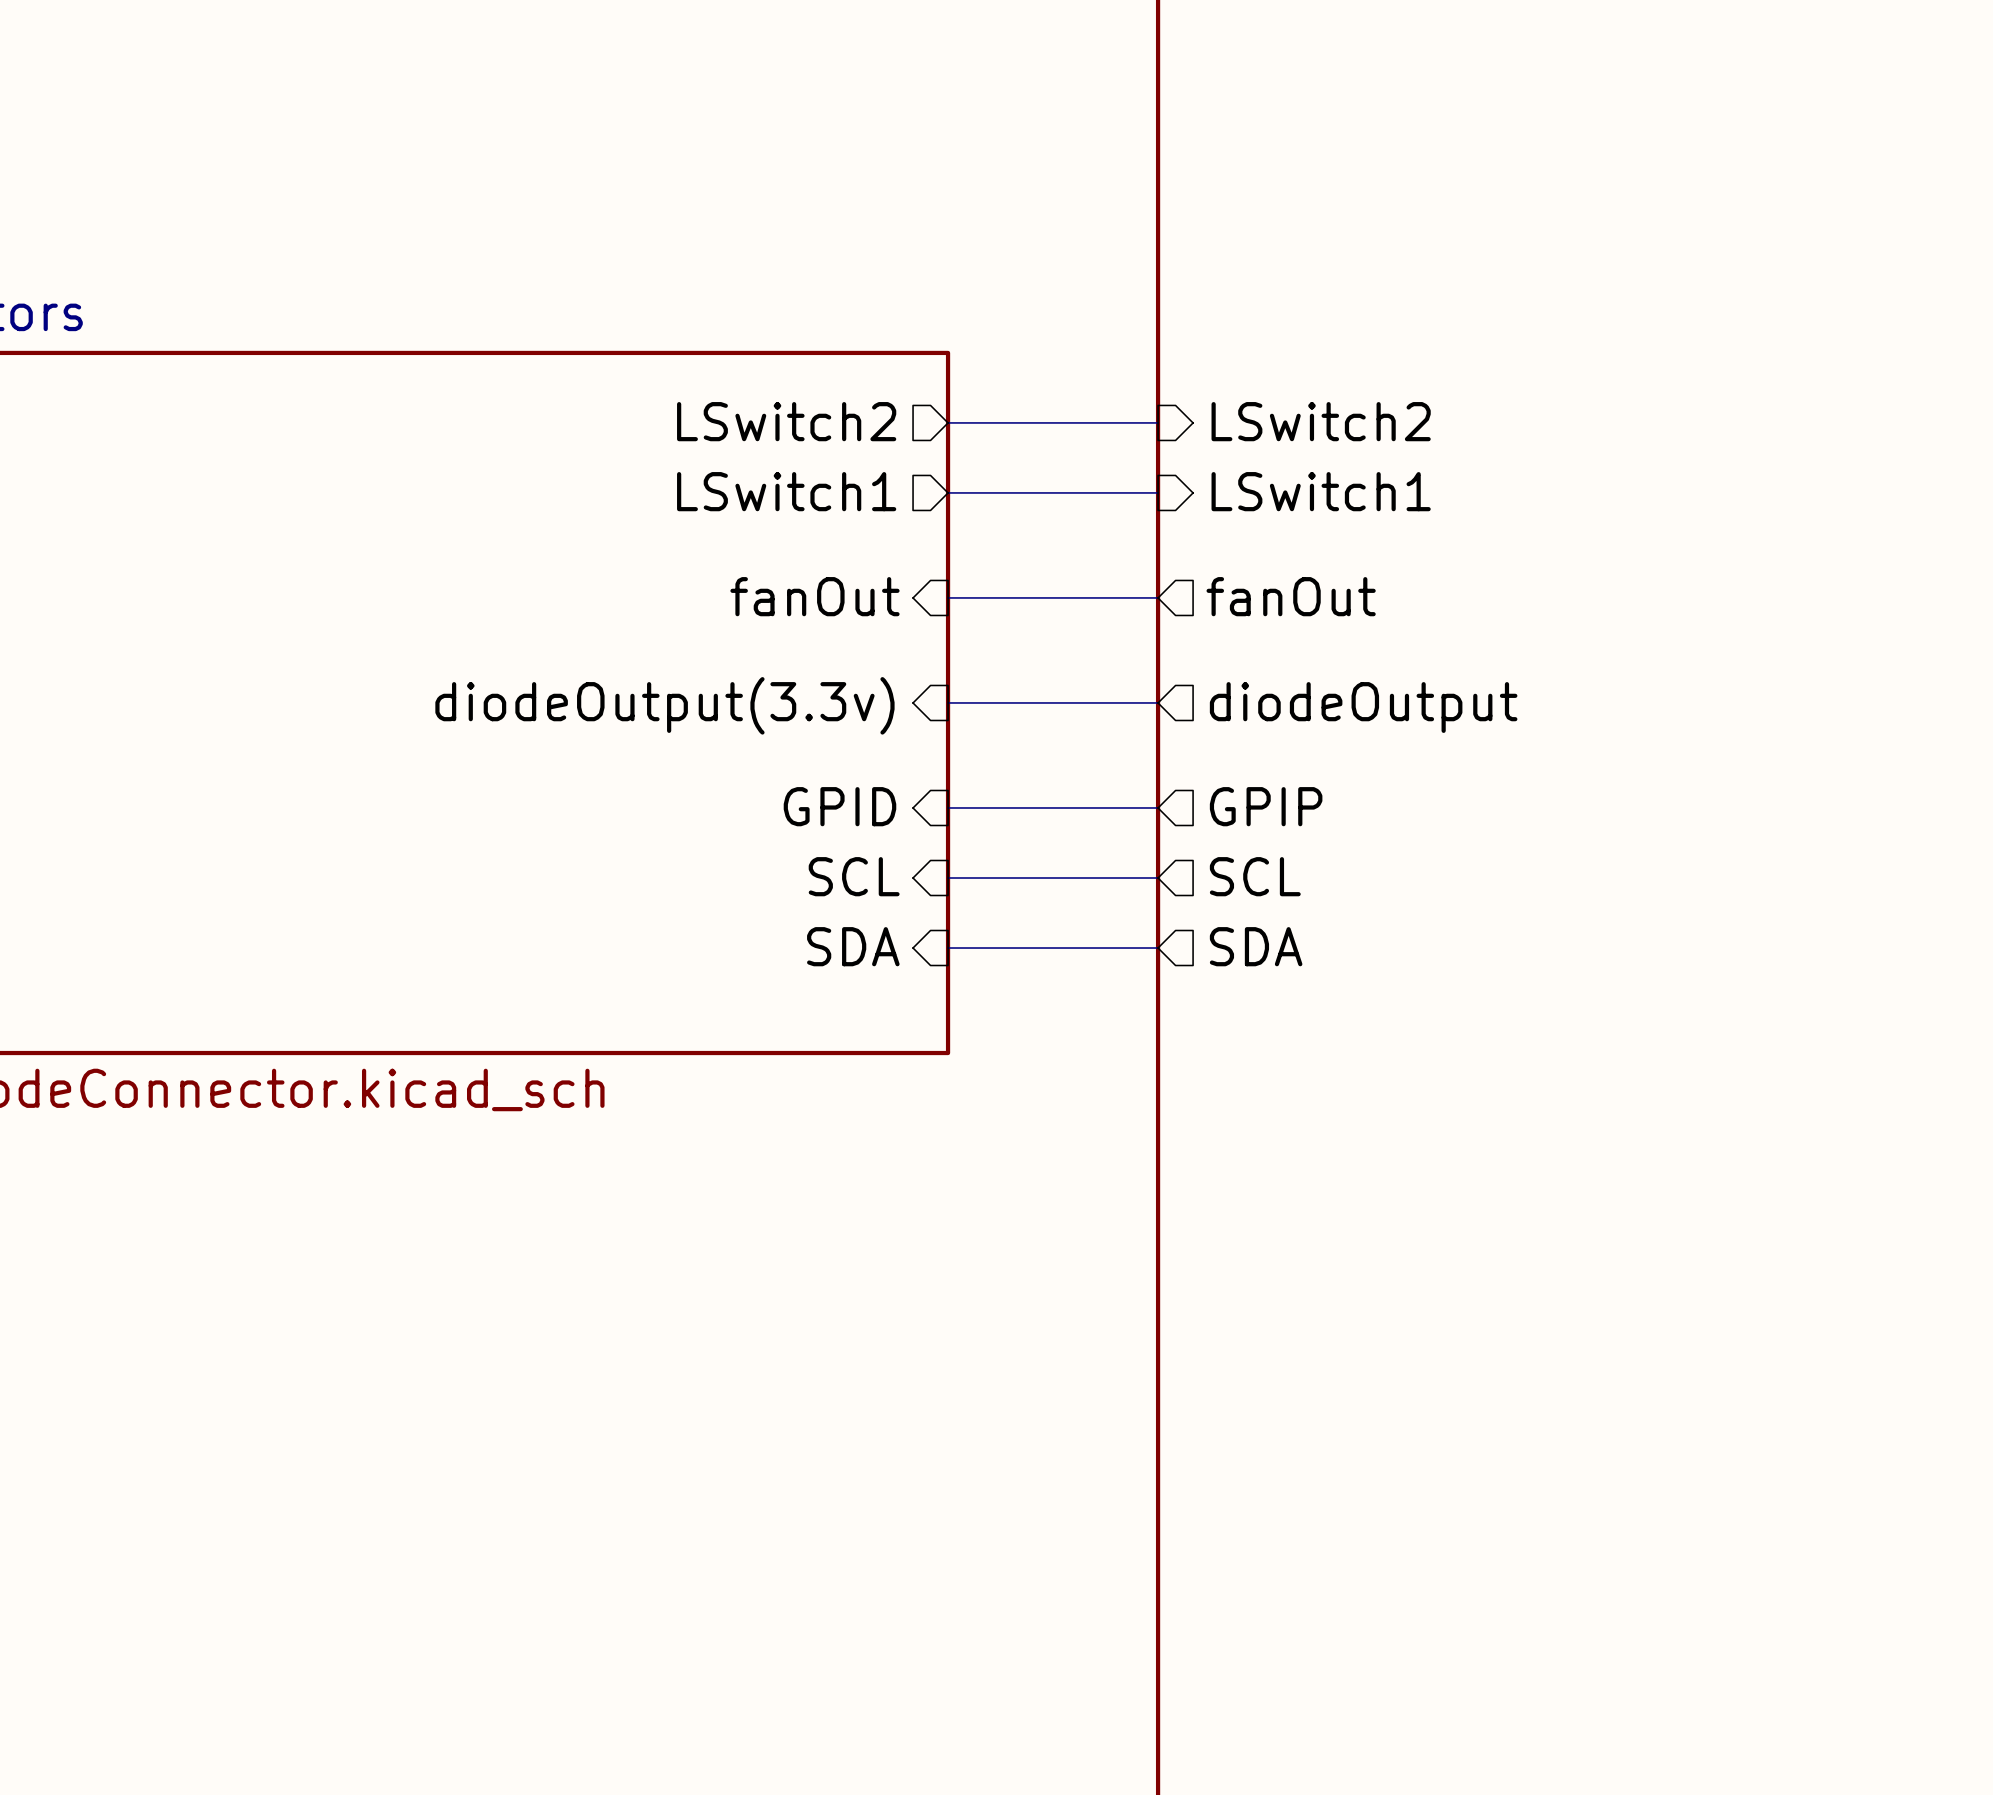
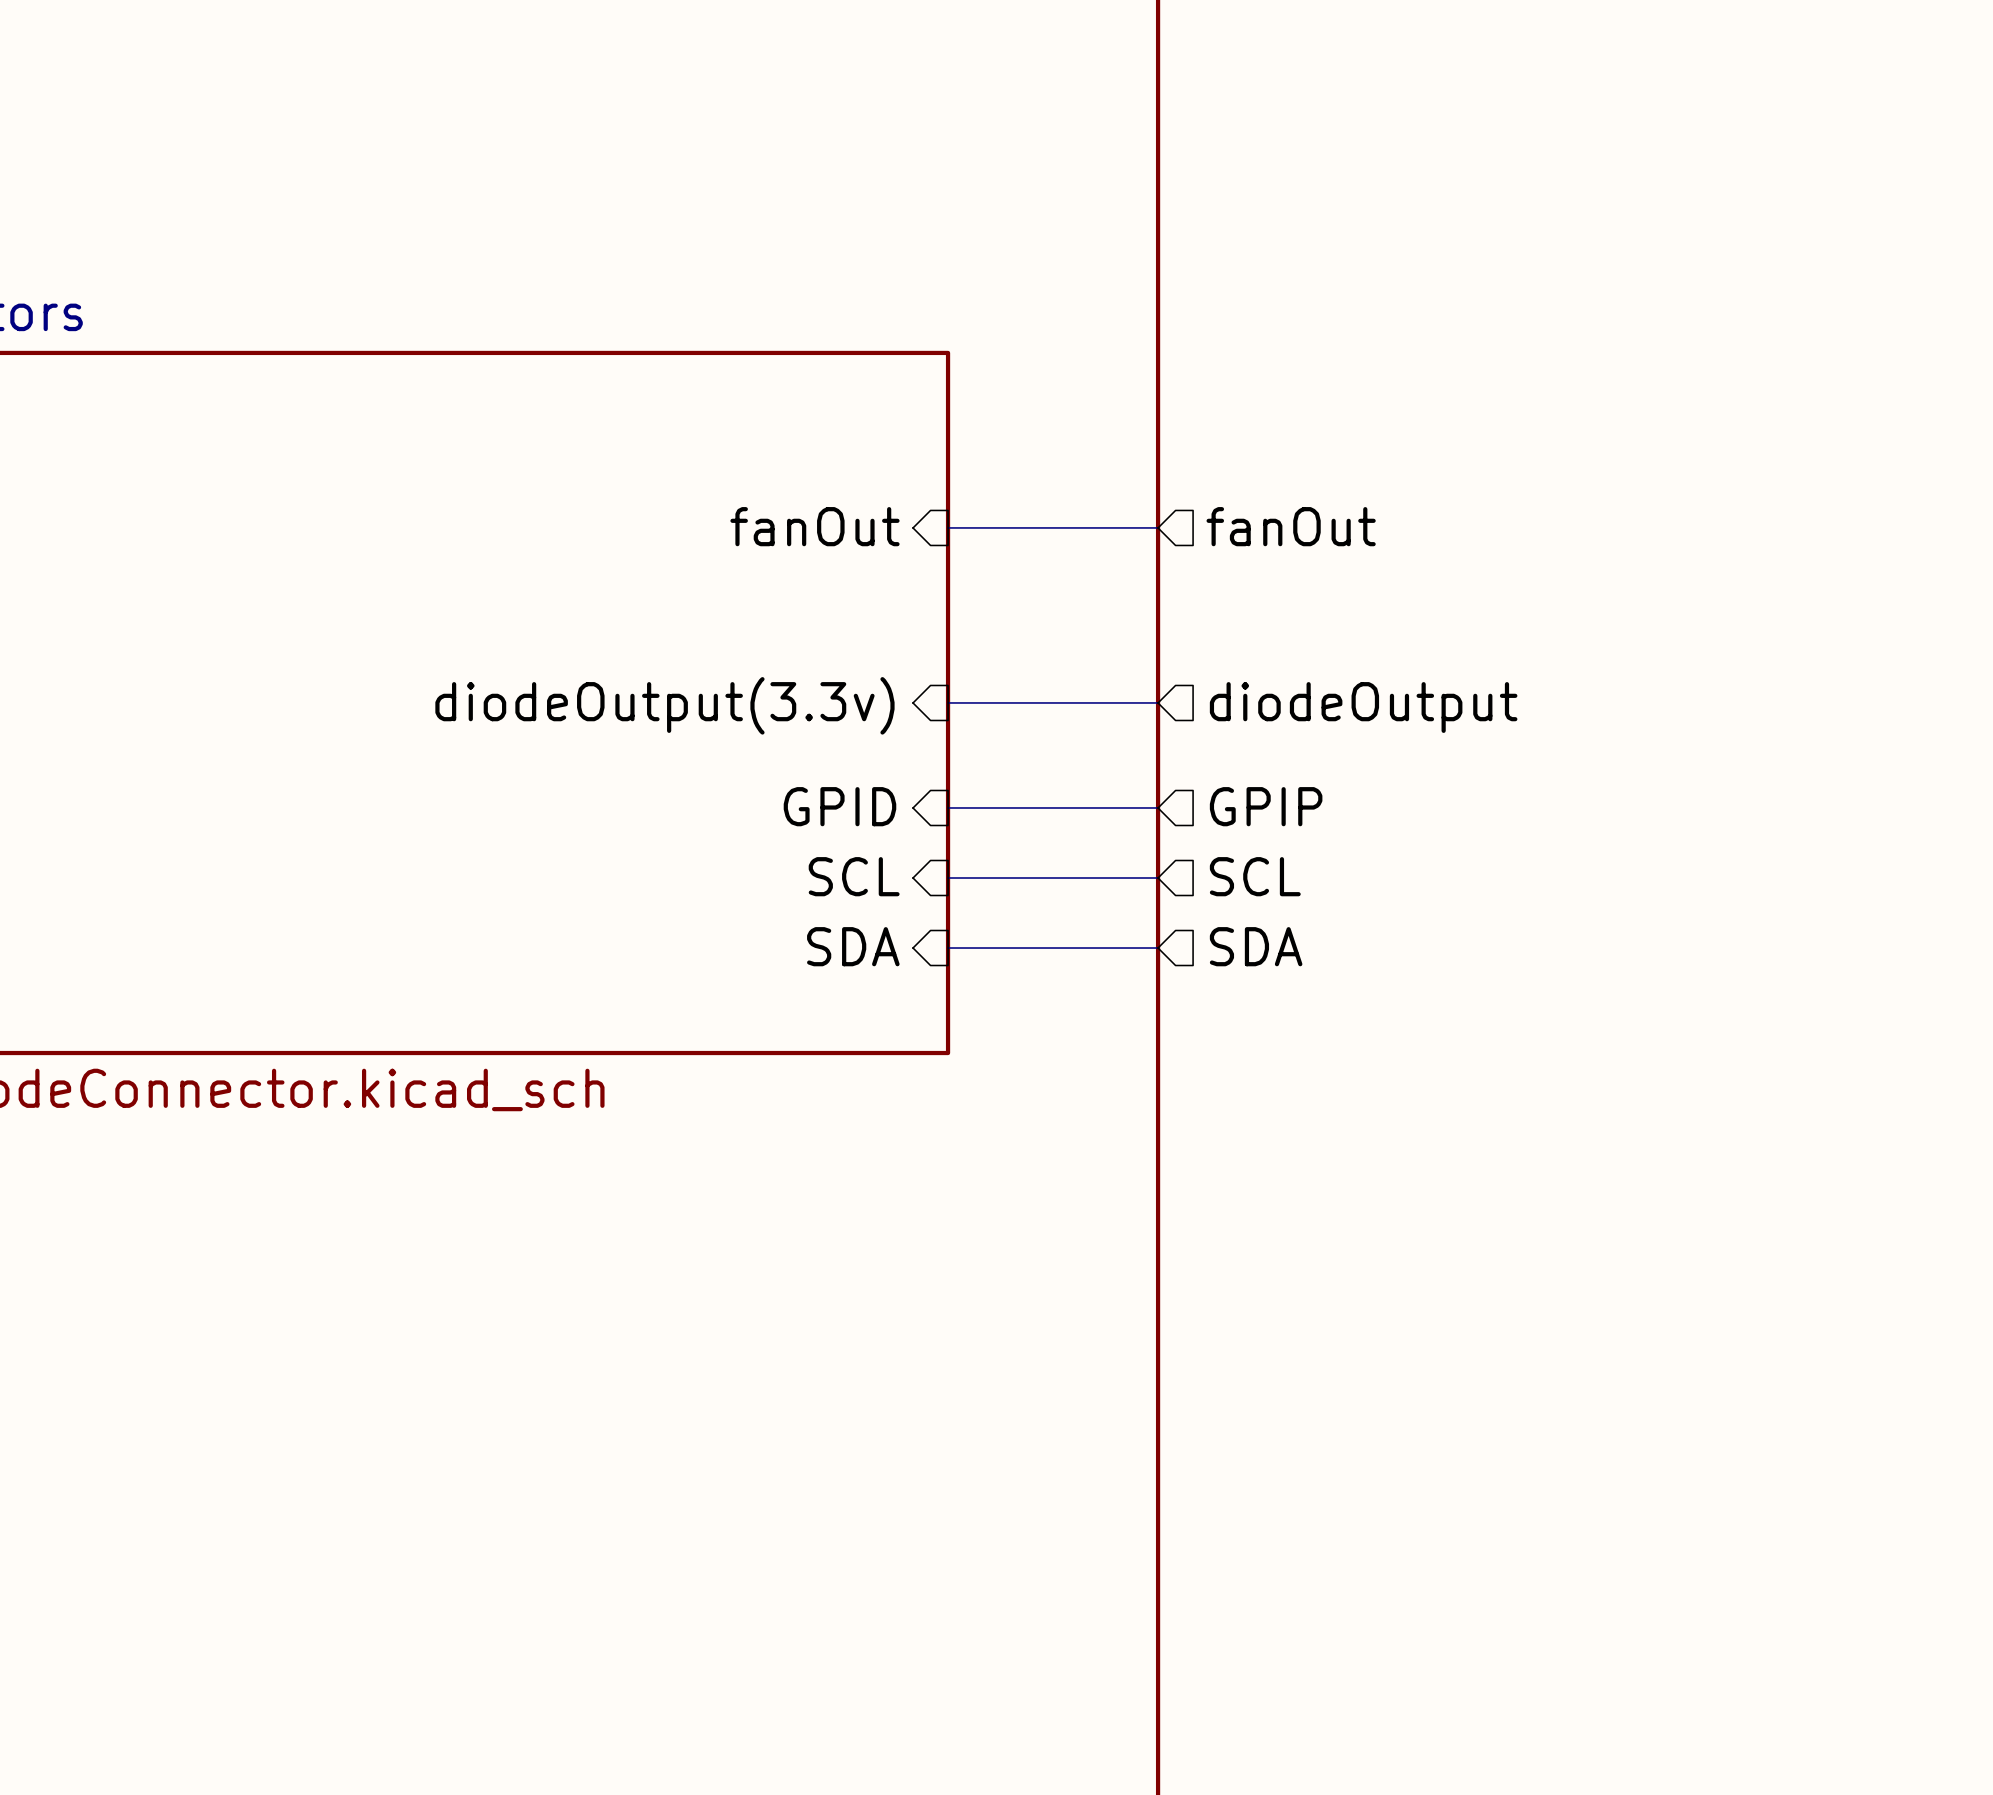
sheet pin: LSwitch2 (786, 421) -> none
sheet pin: LSwitch2 (1321, 421) -> none
wire: (948, 422) (1158, 422) -> none
sheet pin: LSwitch1 (786, 491) -> none
sheet pin: LSwitch1 (1321, 491) -> none
wire: (948, 492) (1158, 492) -> (948, 527) (1158, 527)
sheet pin position: fanOut (814, 596) -> fanOut (814, 526)
sheet pin position: fanOut (1291, 596) -> fanOut (1291, 526)
wire: (948, 597) (1158, 597) -> none

